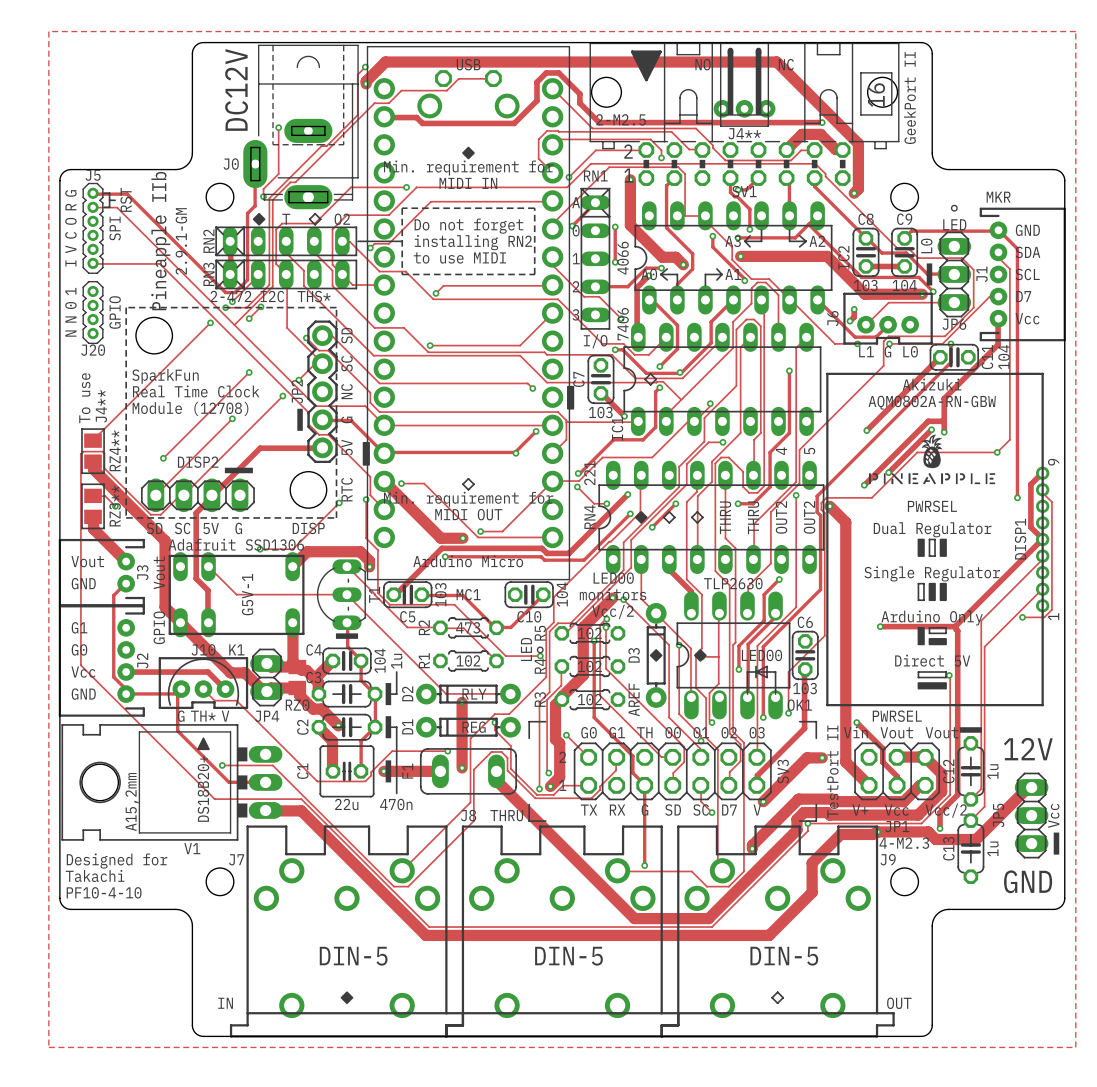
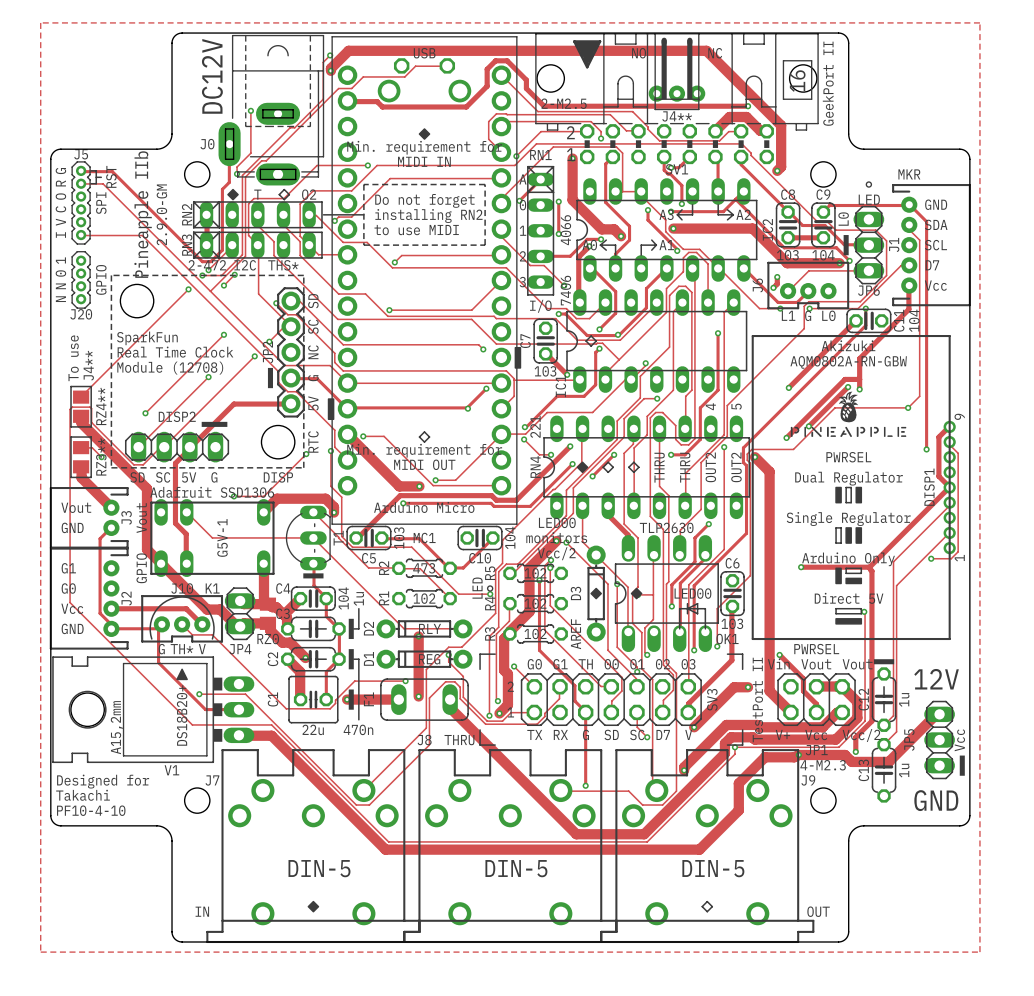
text: 2.9.1-GM (181, 241) -> 2.9.0-GM (161, 214)

